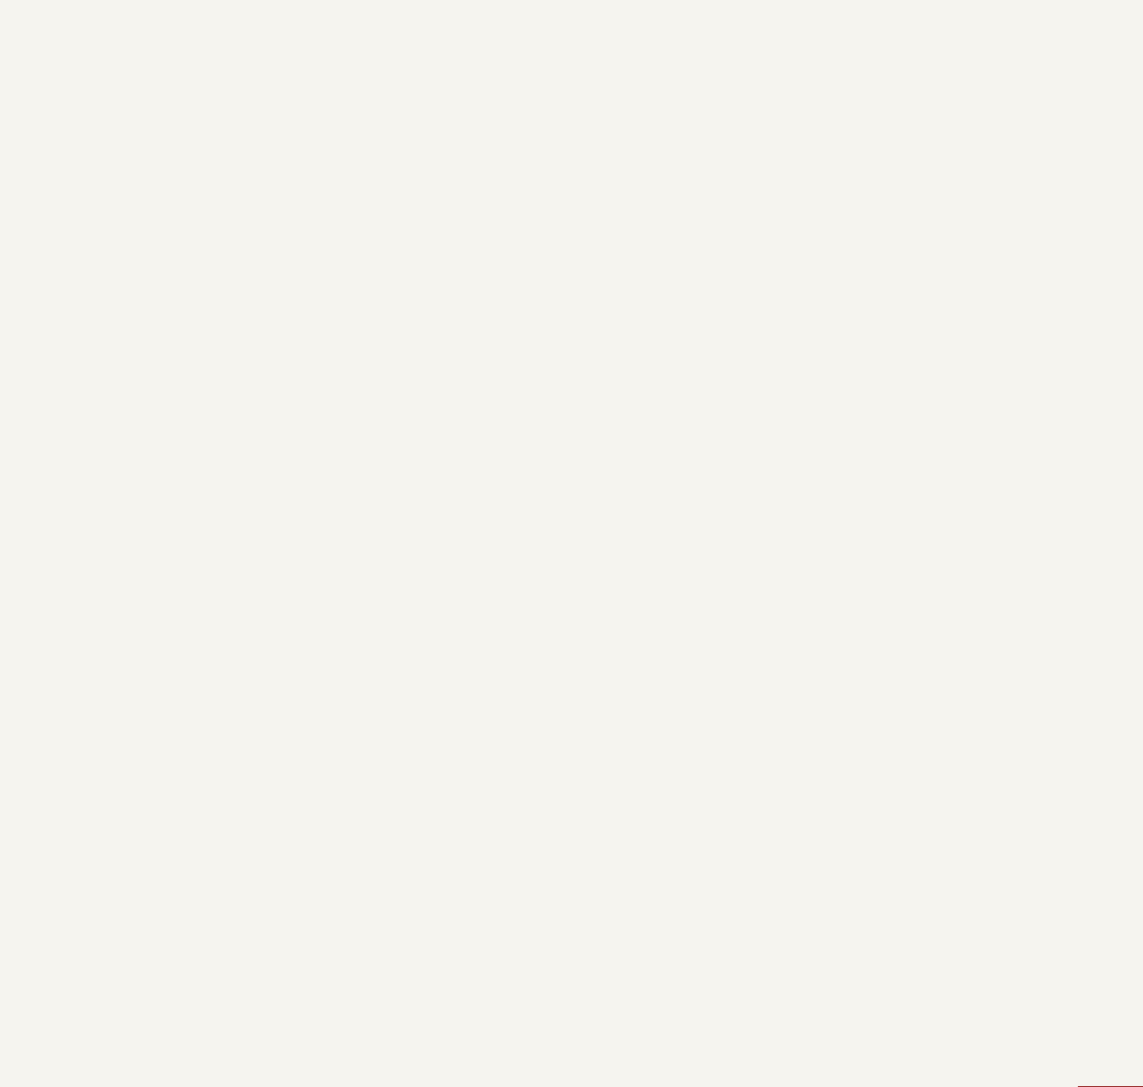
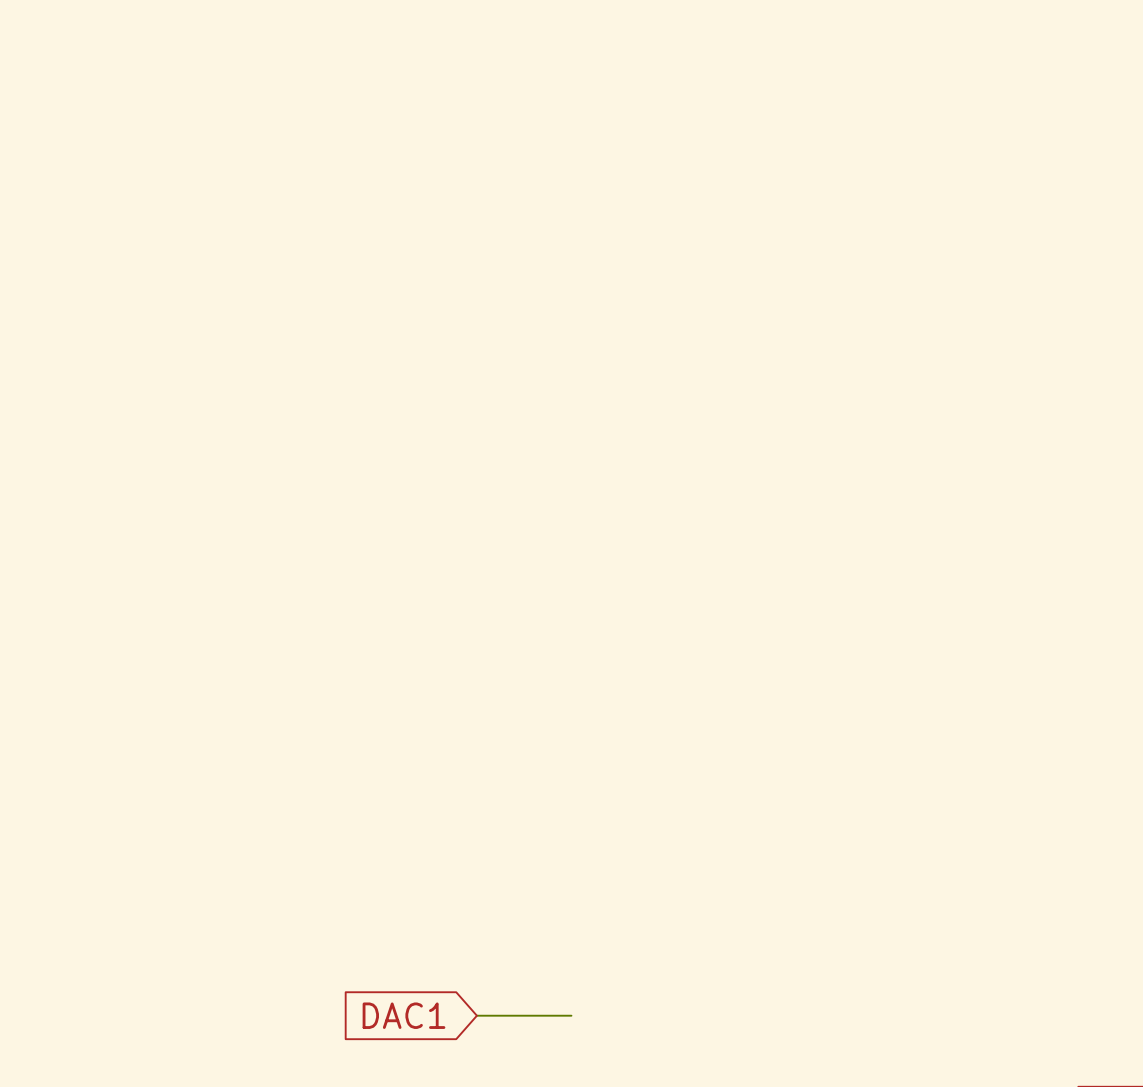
global label: none -> DAC1 (404, 1015)
wire: none -> (476, 1015) (571, 1015)

